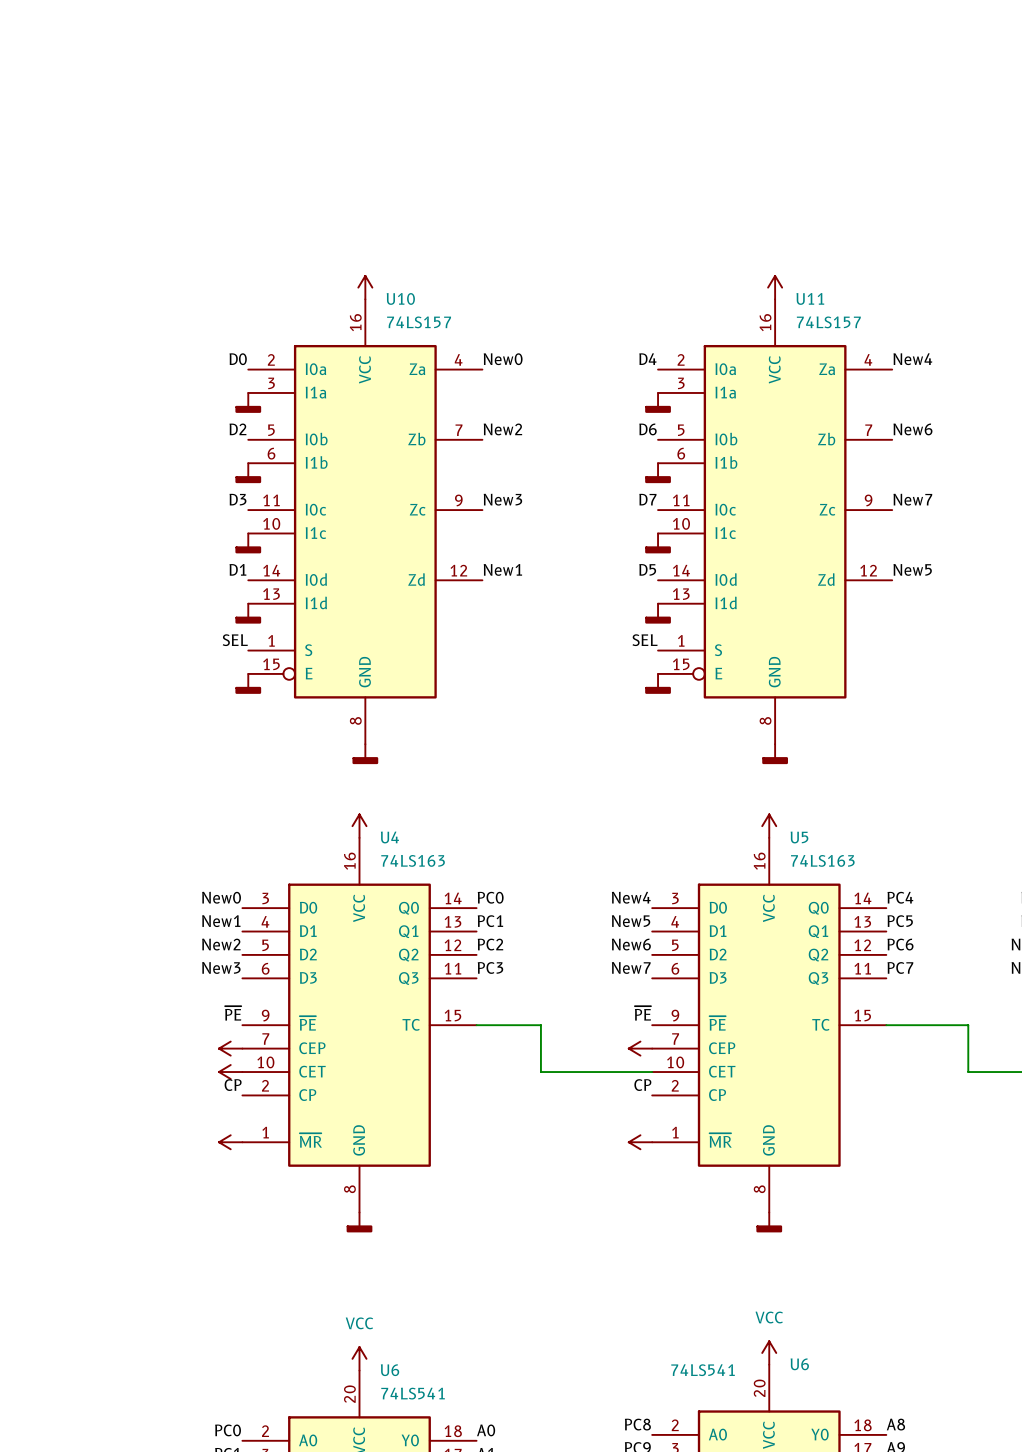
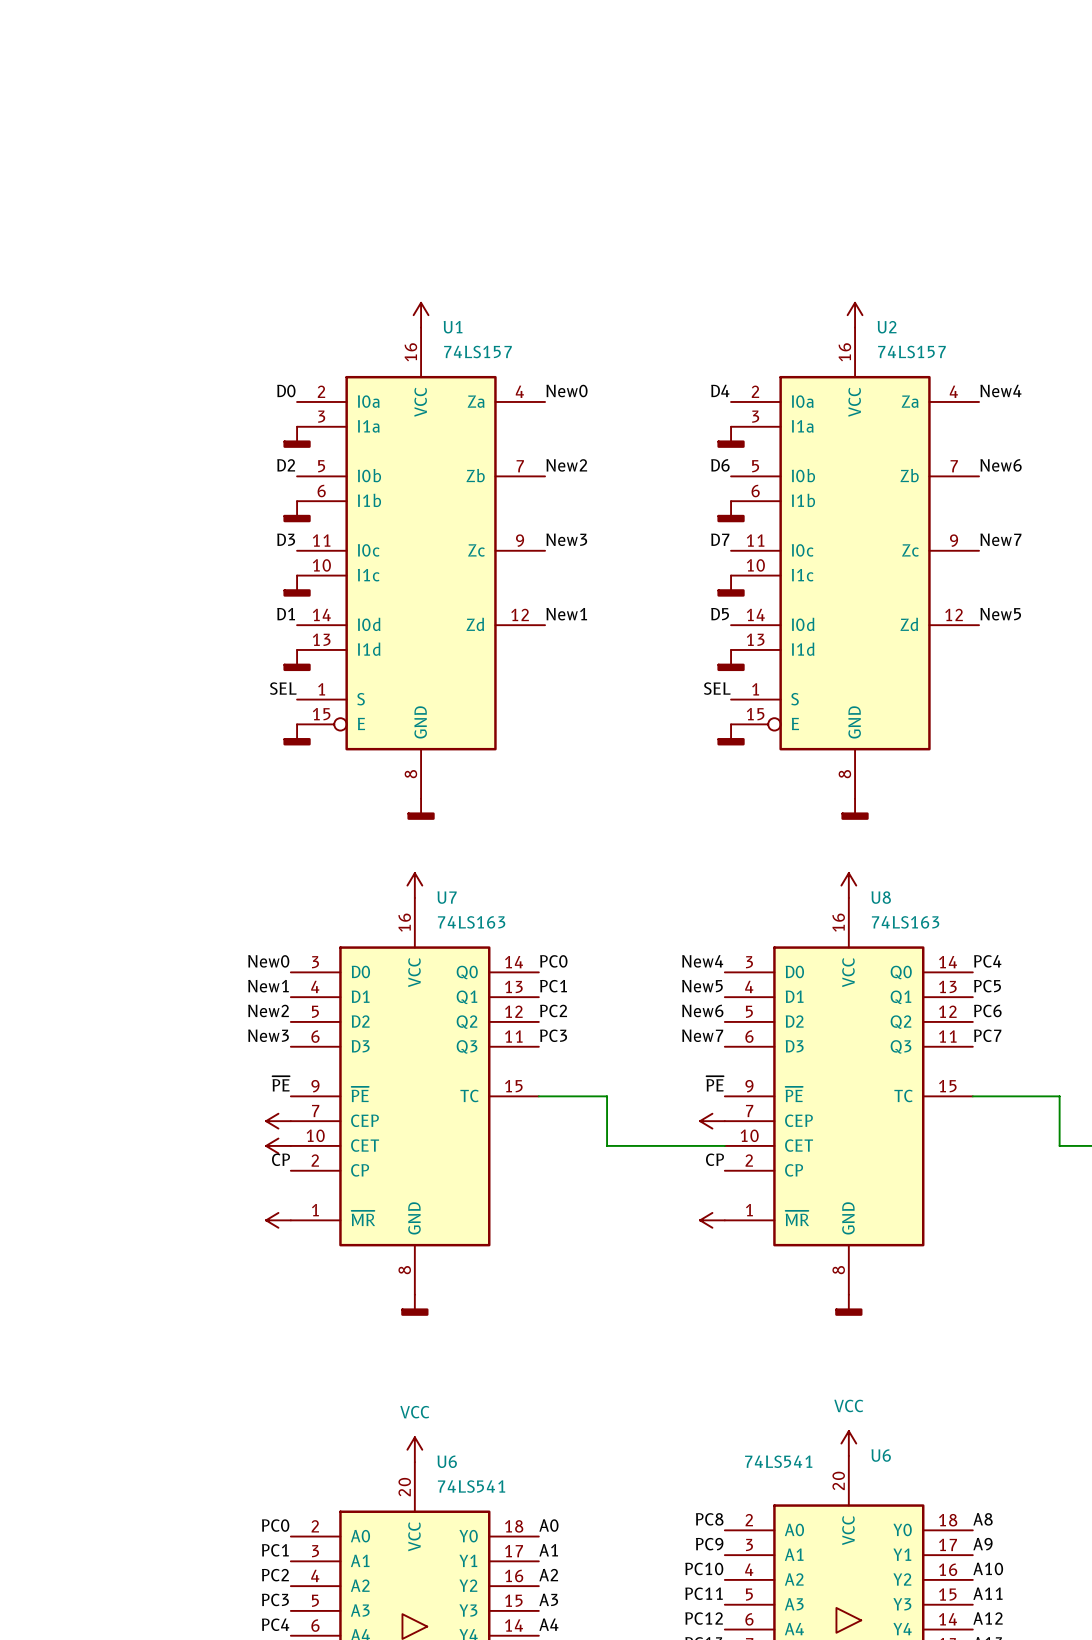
U10 name: U10 (400, 298) -> U1 (453, 327)
U11 name: U11 (810, 298) -> U2 (887, 327)
U4 name: U4 (389, 837) -> U7 (447, 897)
U5 name: U5 (799, 837) -> U8 (881, 897)

